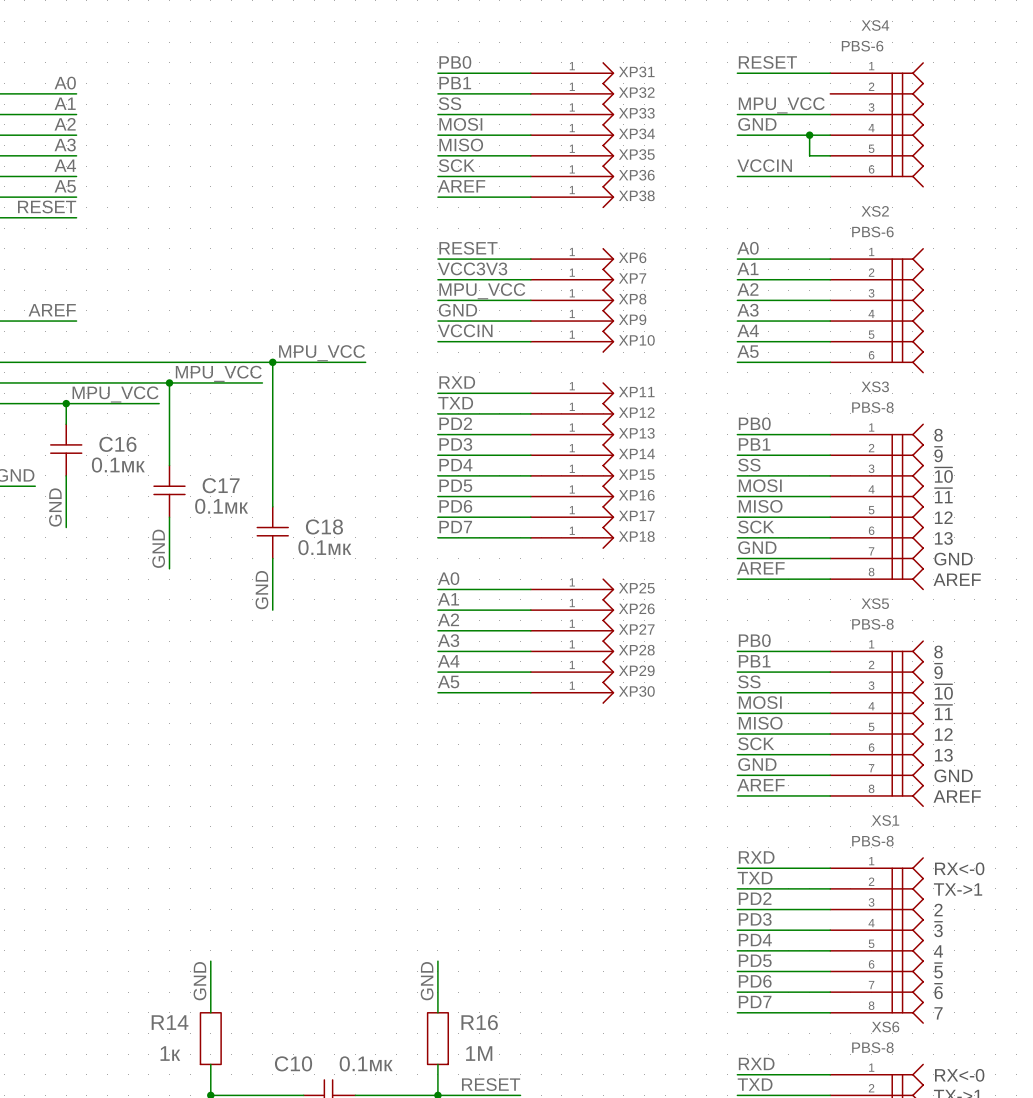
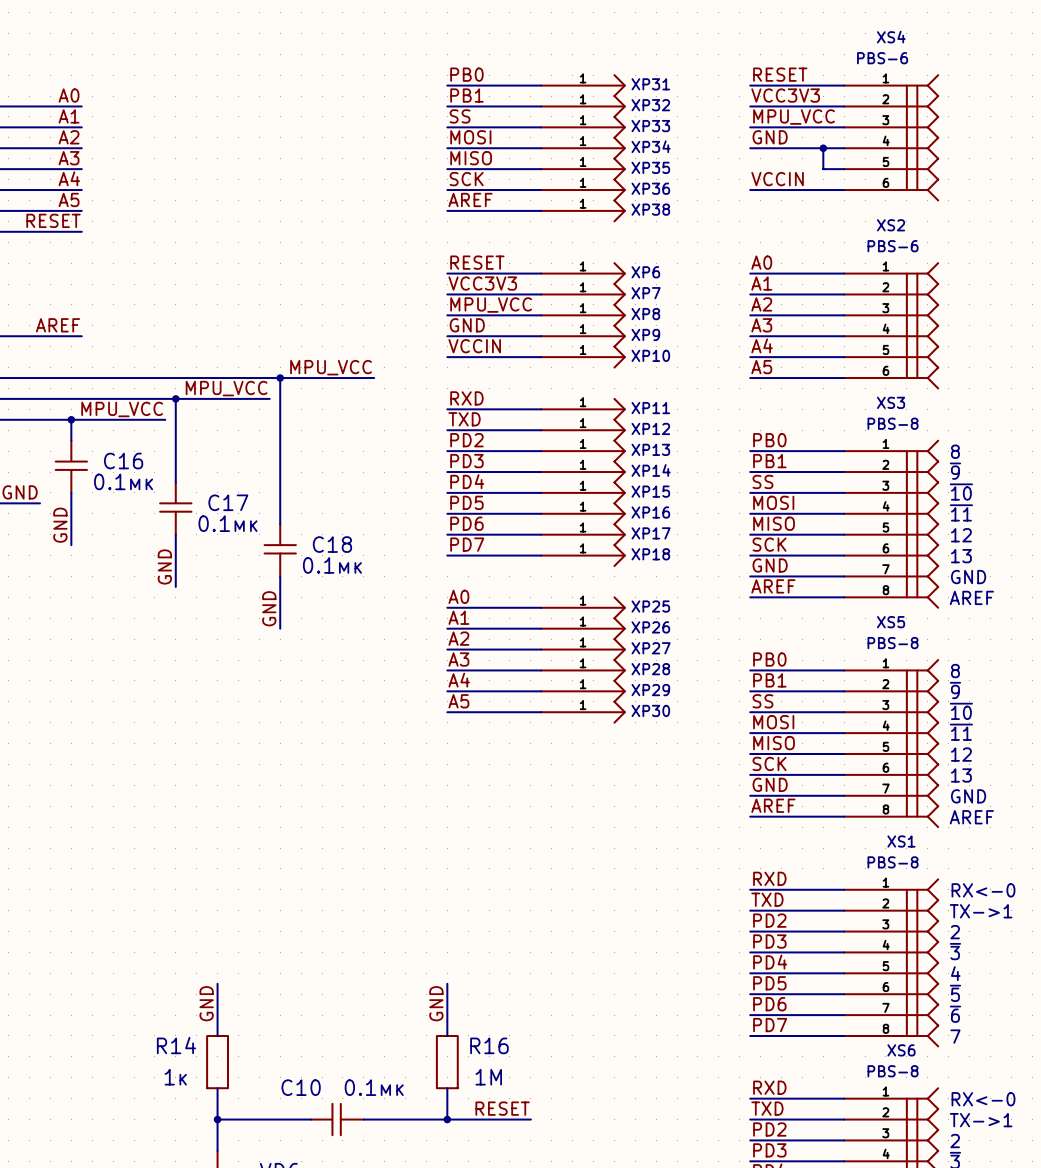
label: none -> VCC3V3 (785, 95)
wire: none -> (750, 106) (844, 106)

